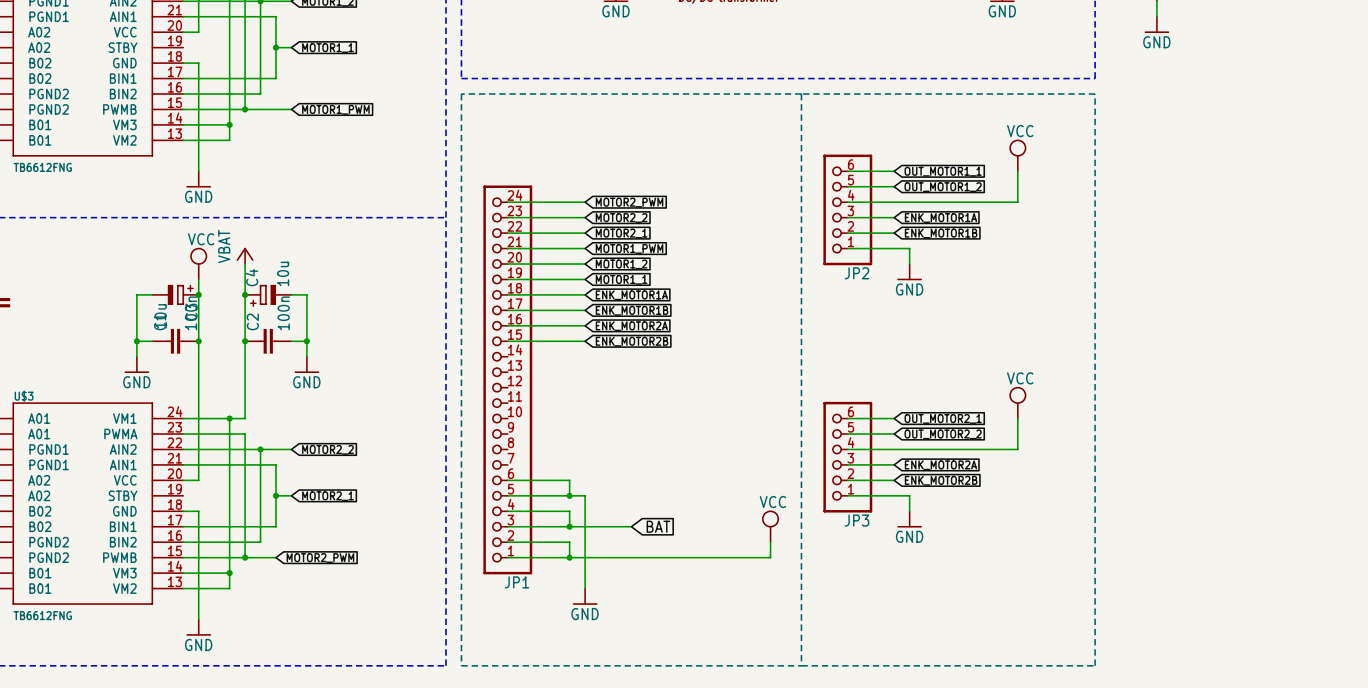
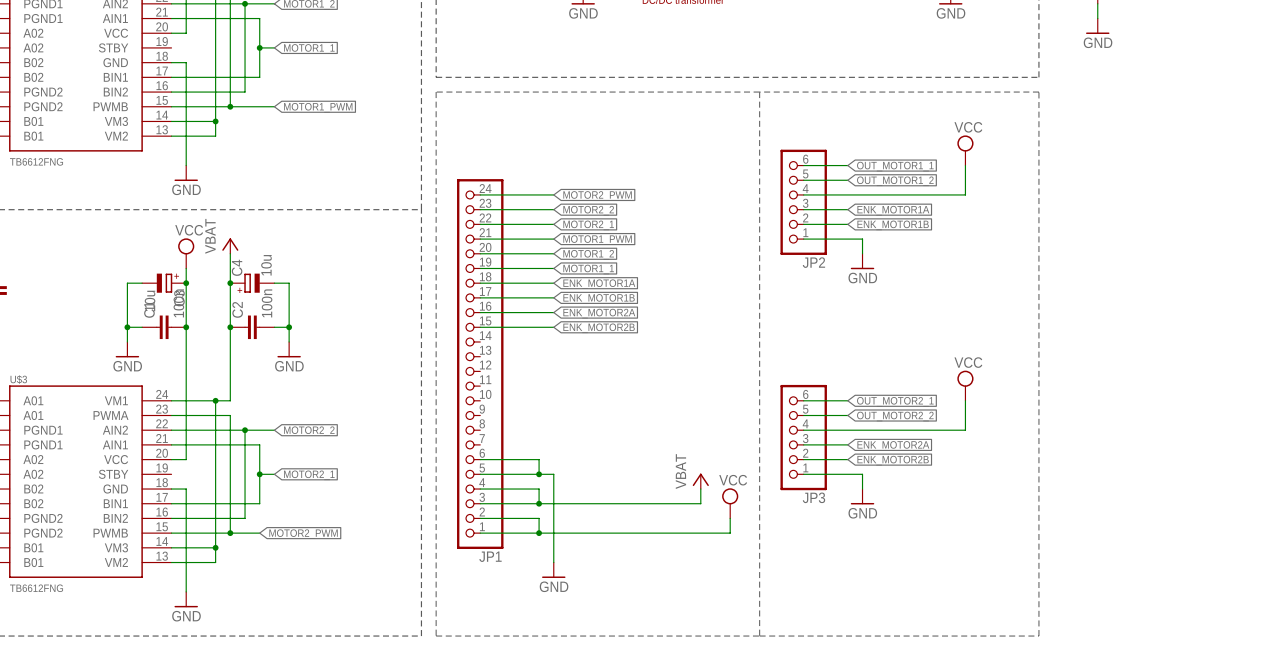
power symbol: none -> VBAT (700, 481)
wire: none -> (700, 489) (700, 503) (597, 503)
global label: BAT (658, 526) -> none

